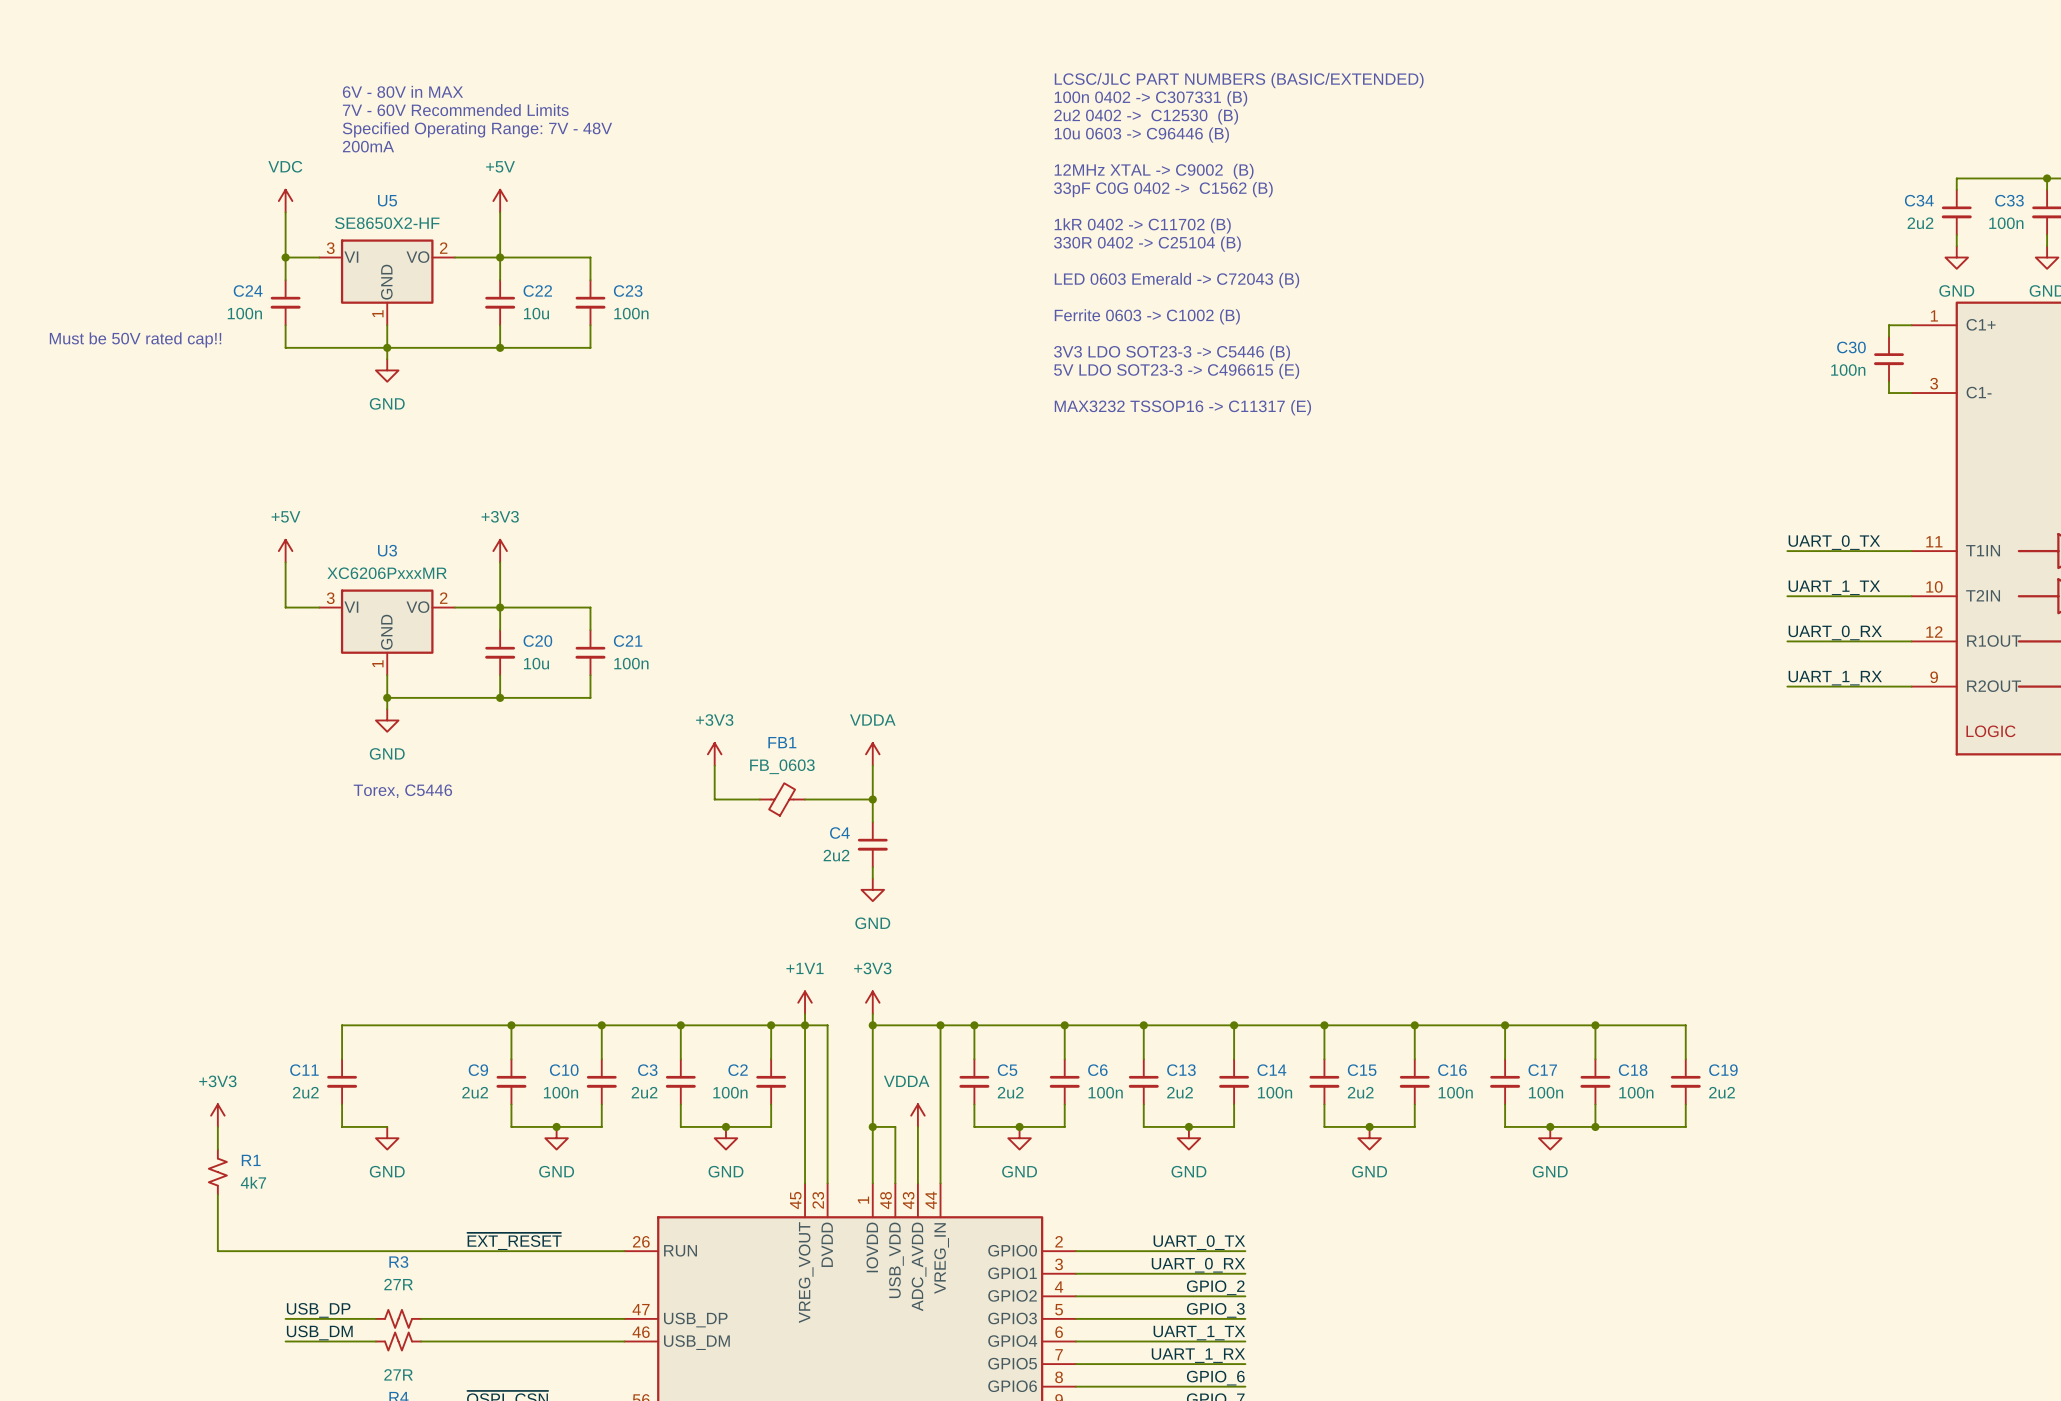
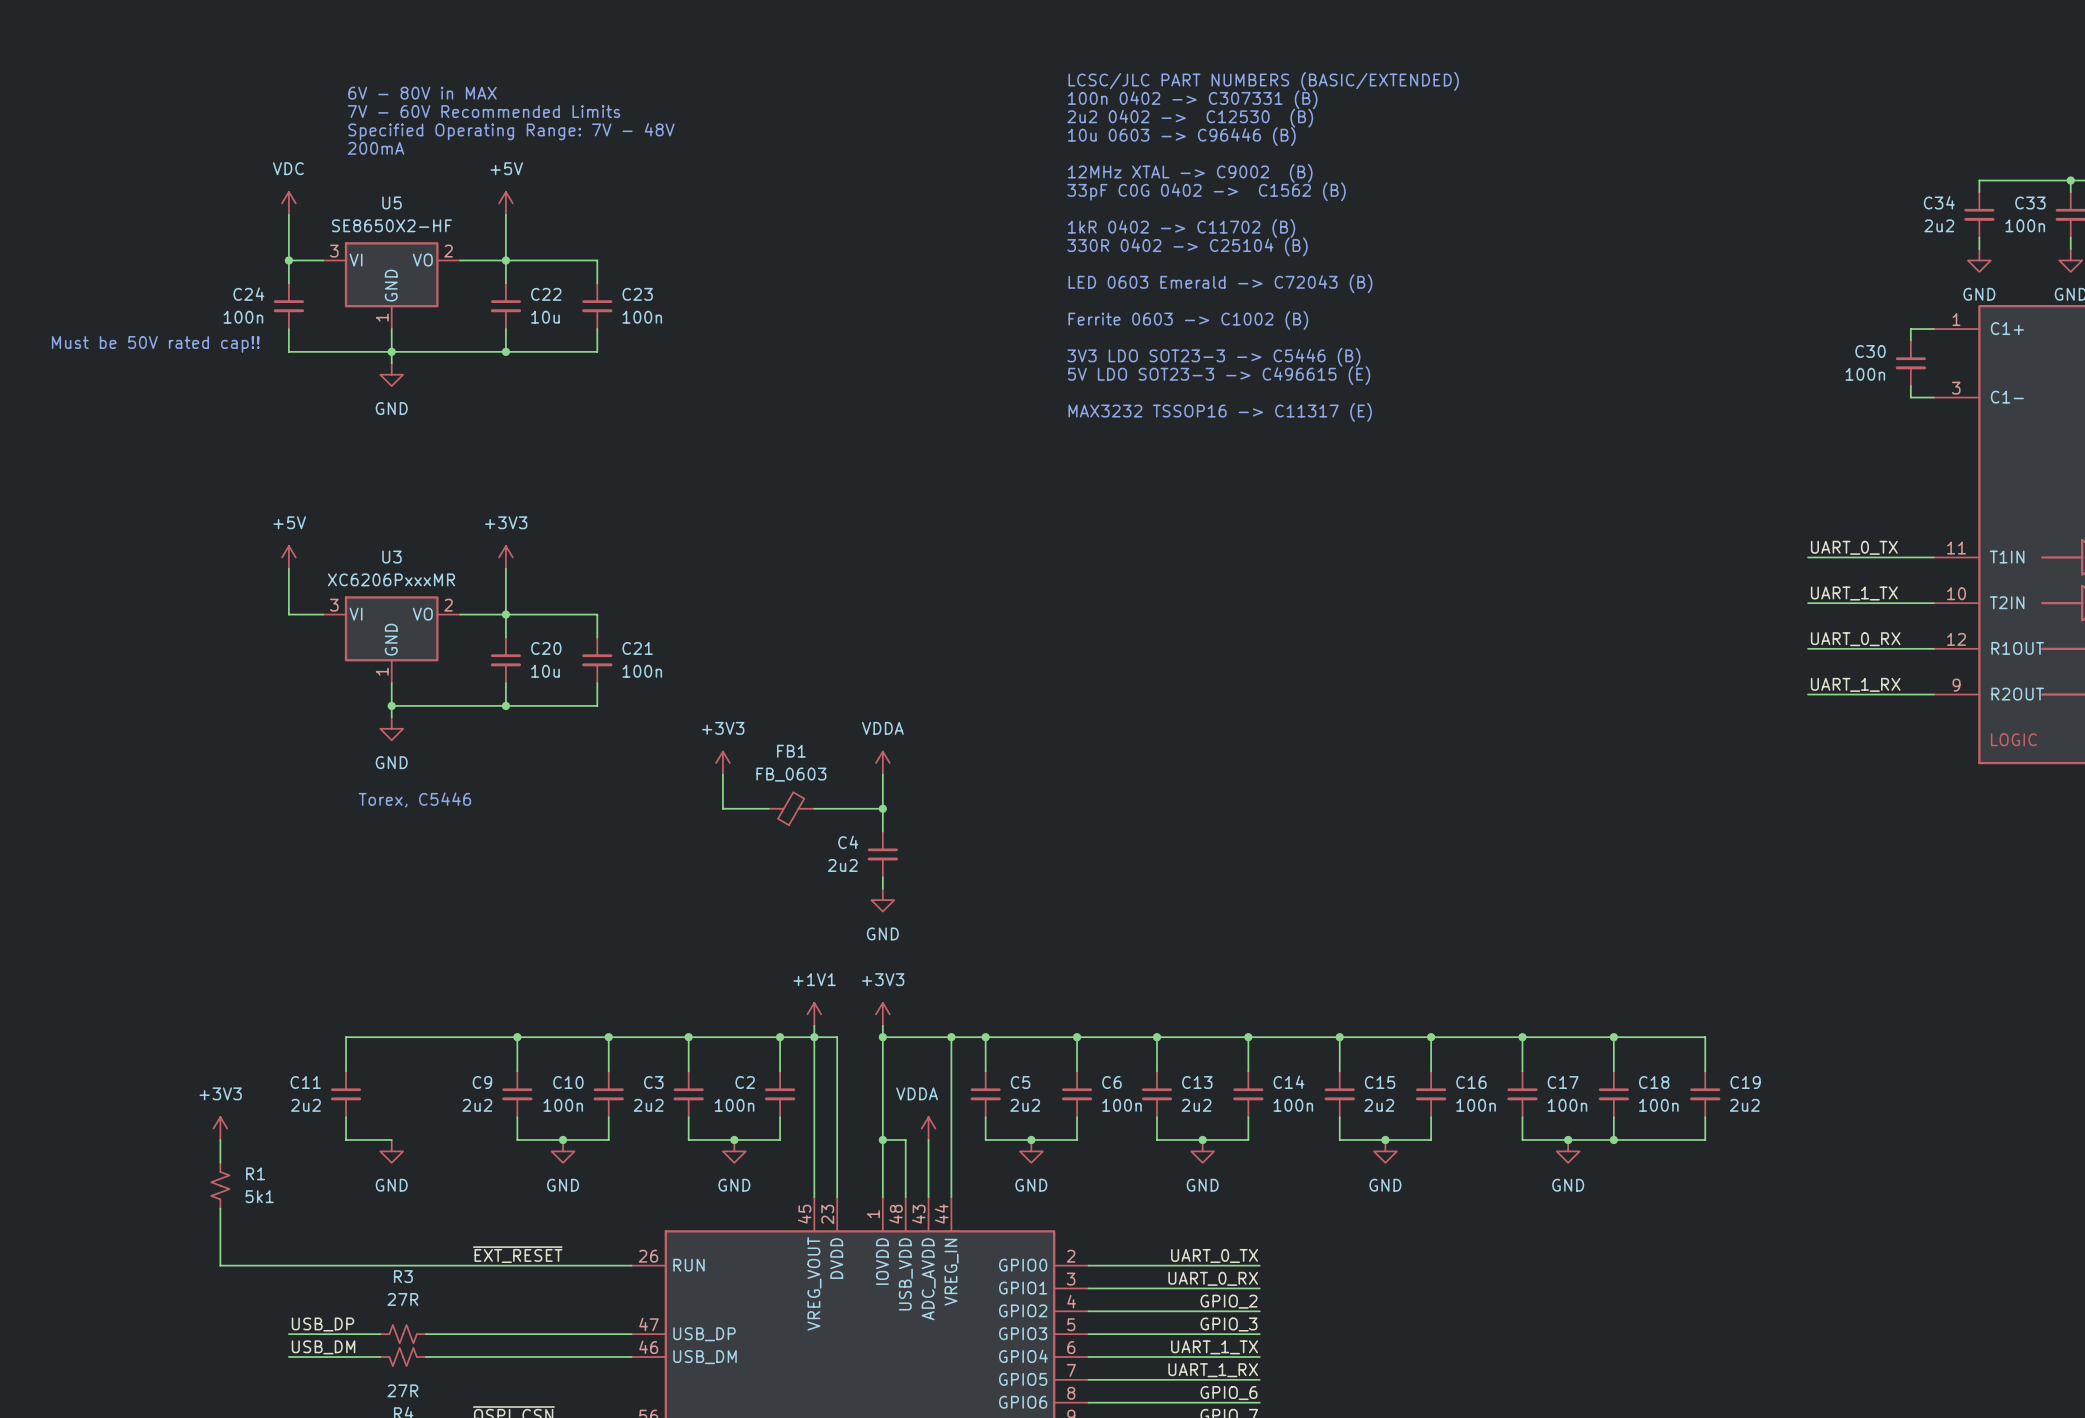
R1 value: 4k7 (253, 1182) -> 5k1 (259, 1196)

